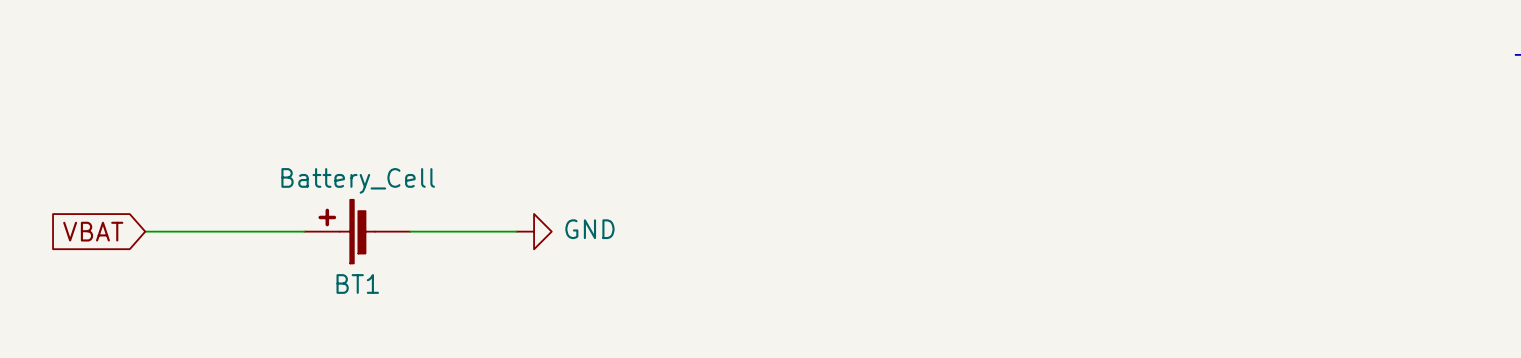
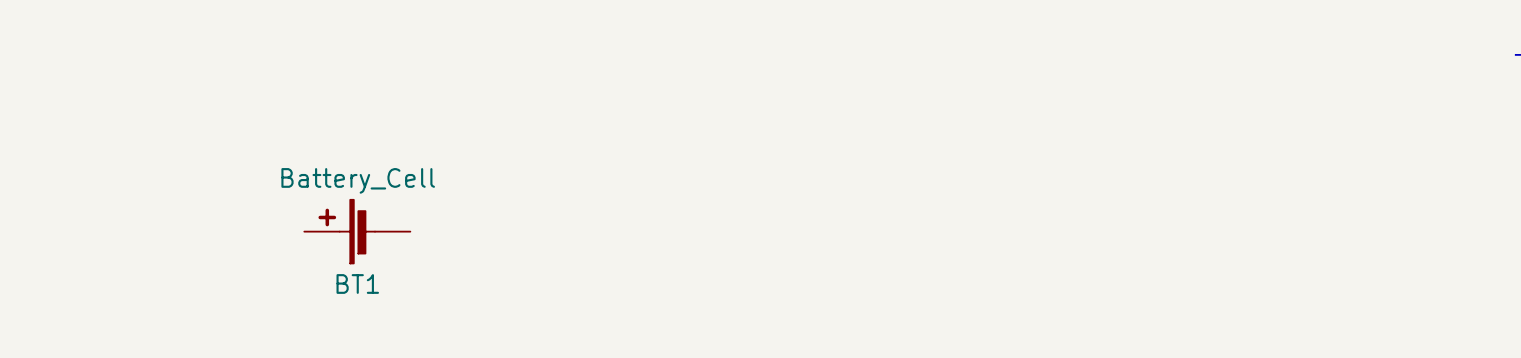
global label: VBAT (93, 231) -> none
wire: (145, 231) (304, 231) -> none
wire: (410, 231) (516, 231) -> none
power symbol: GND (534, 231) -> none

